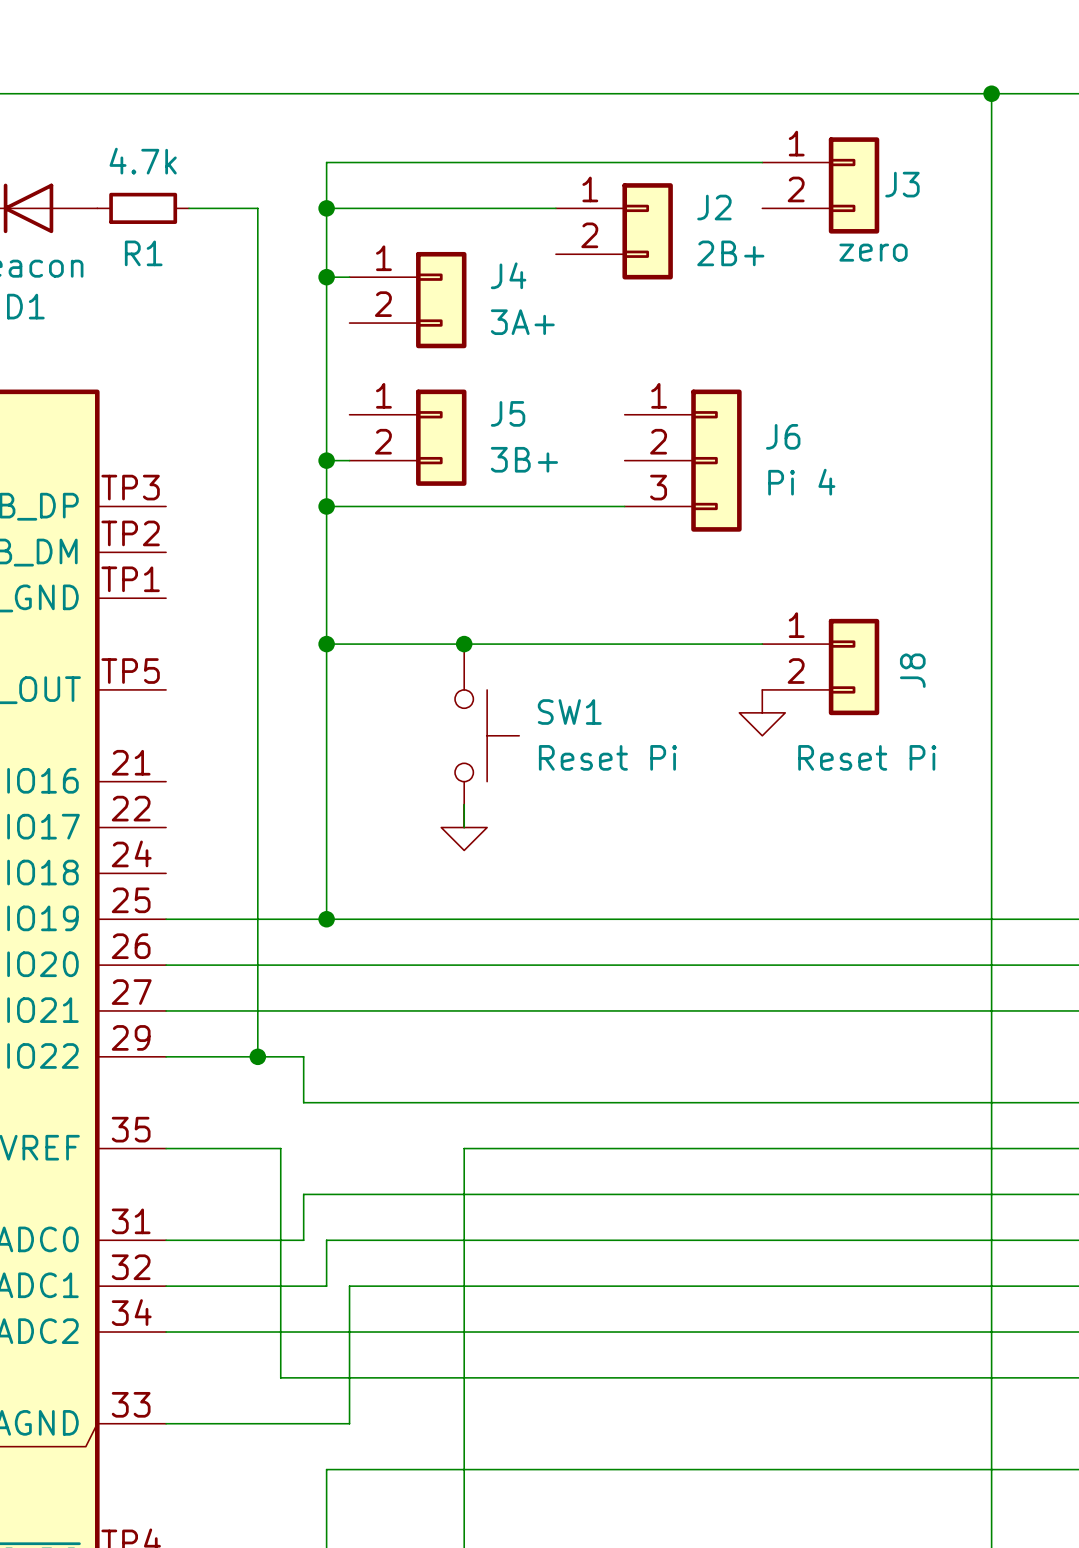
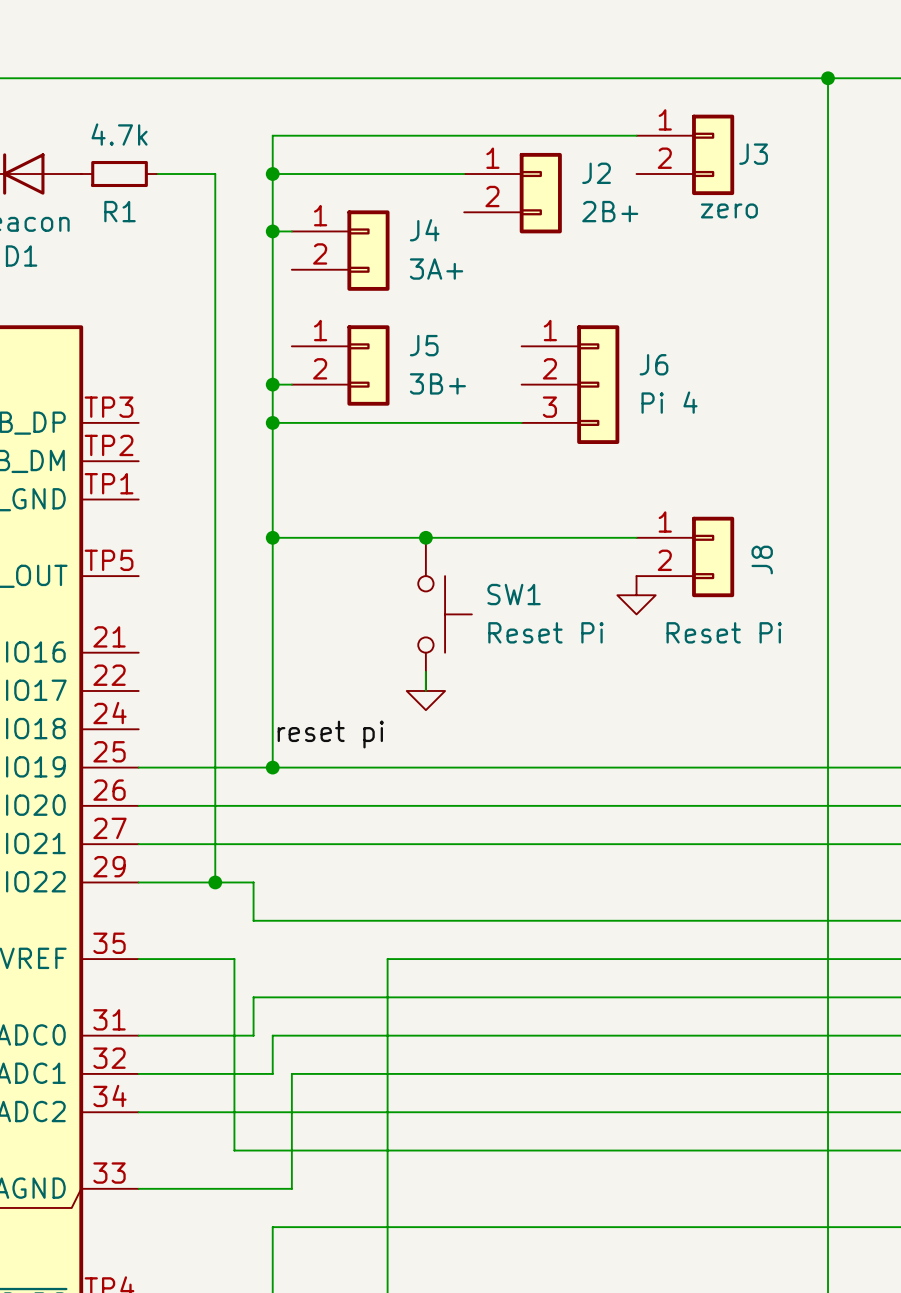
junction position: (464, 644) -> (425, 537)
SW1 position: (487, 735) -> (445, 614)
wire: (464, 804) (464, 827) -> (425, 671) (425, 690)
power symbol position: (464, 827) -> (425, 690)
label: none -> reset pi (330, 734)

